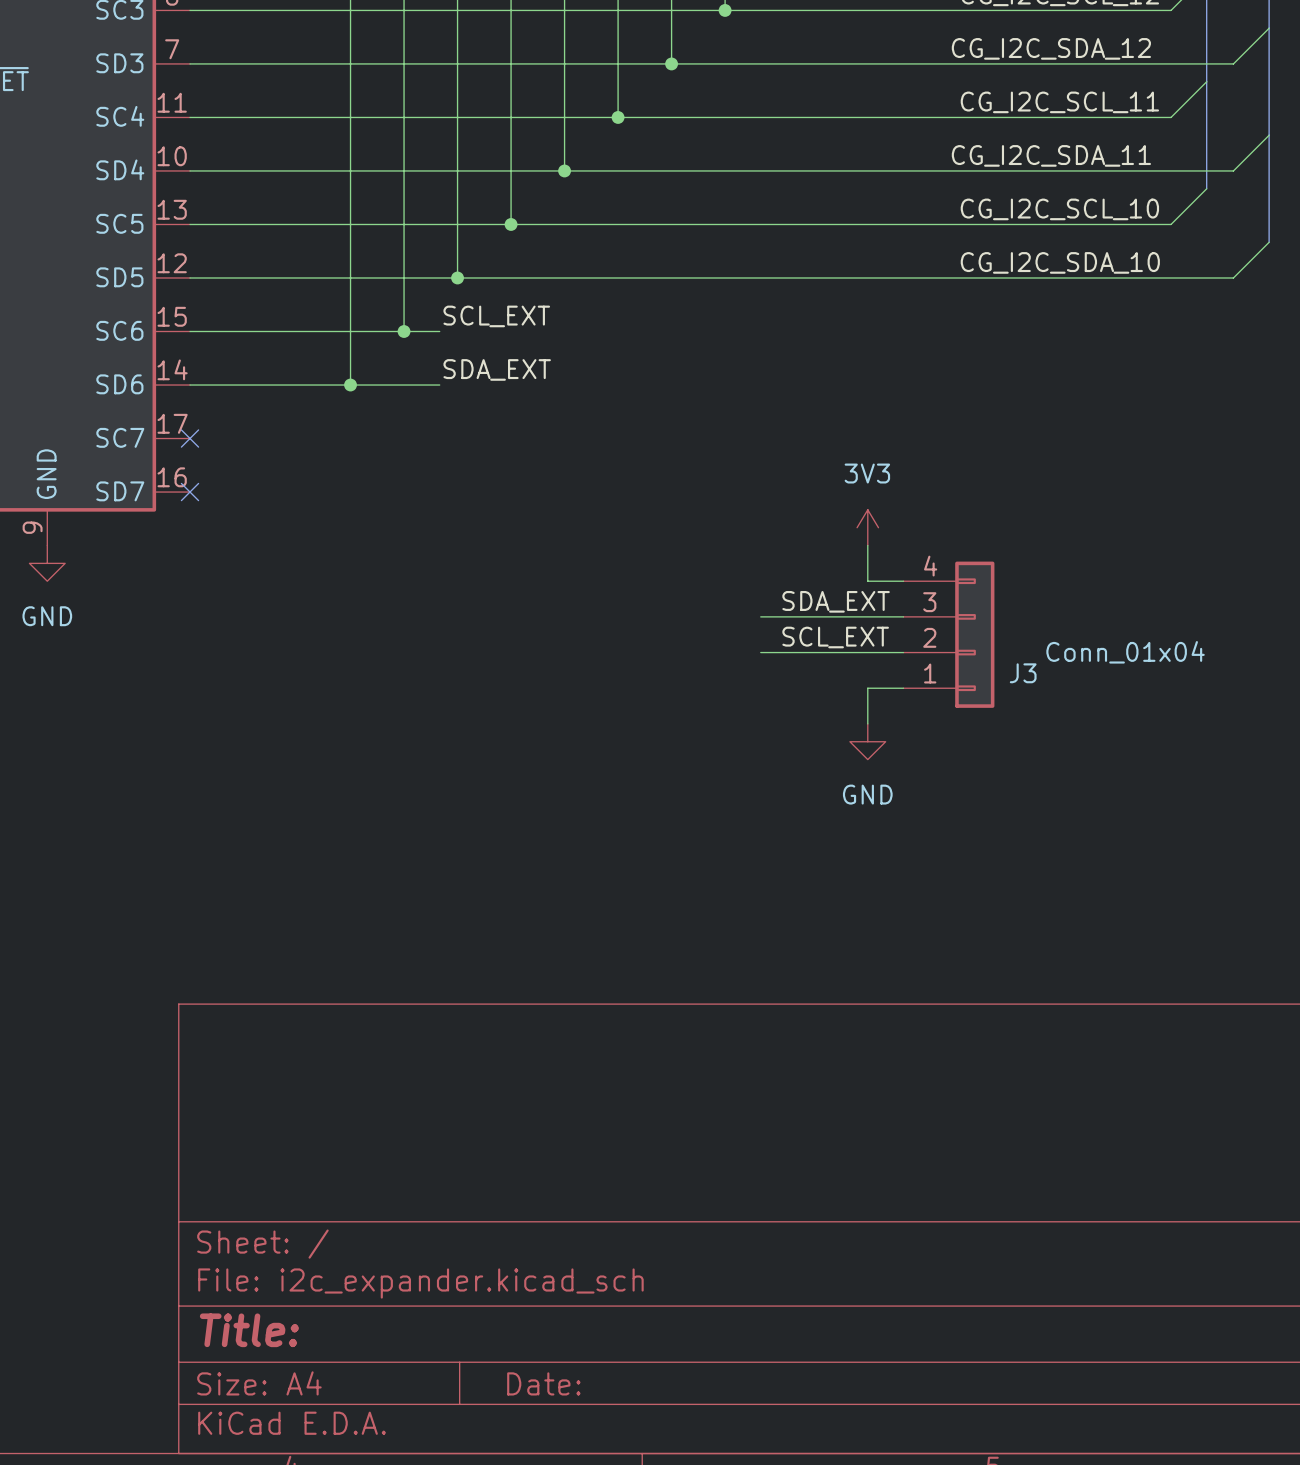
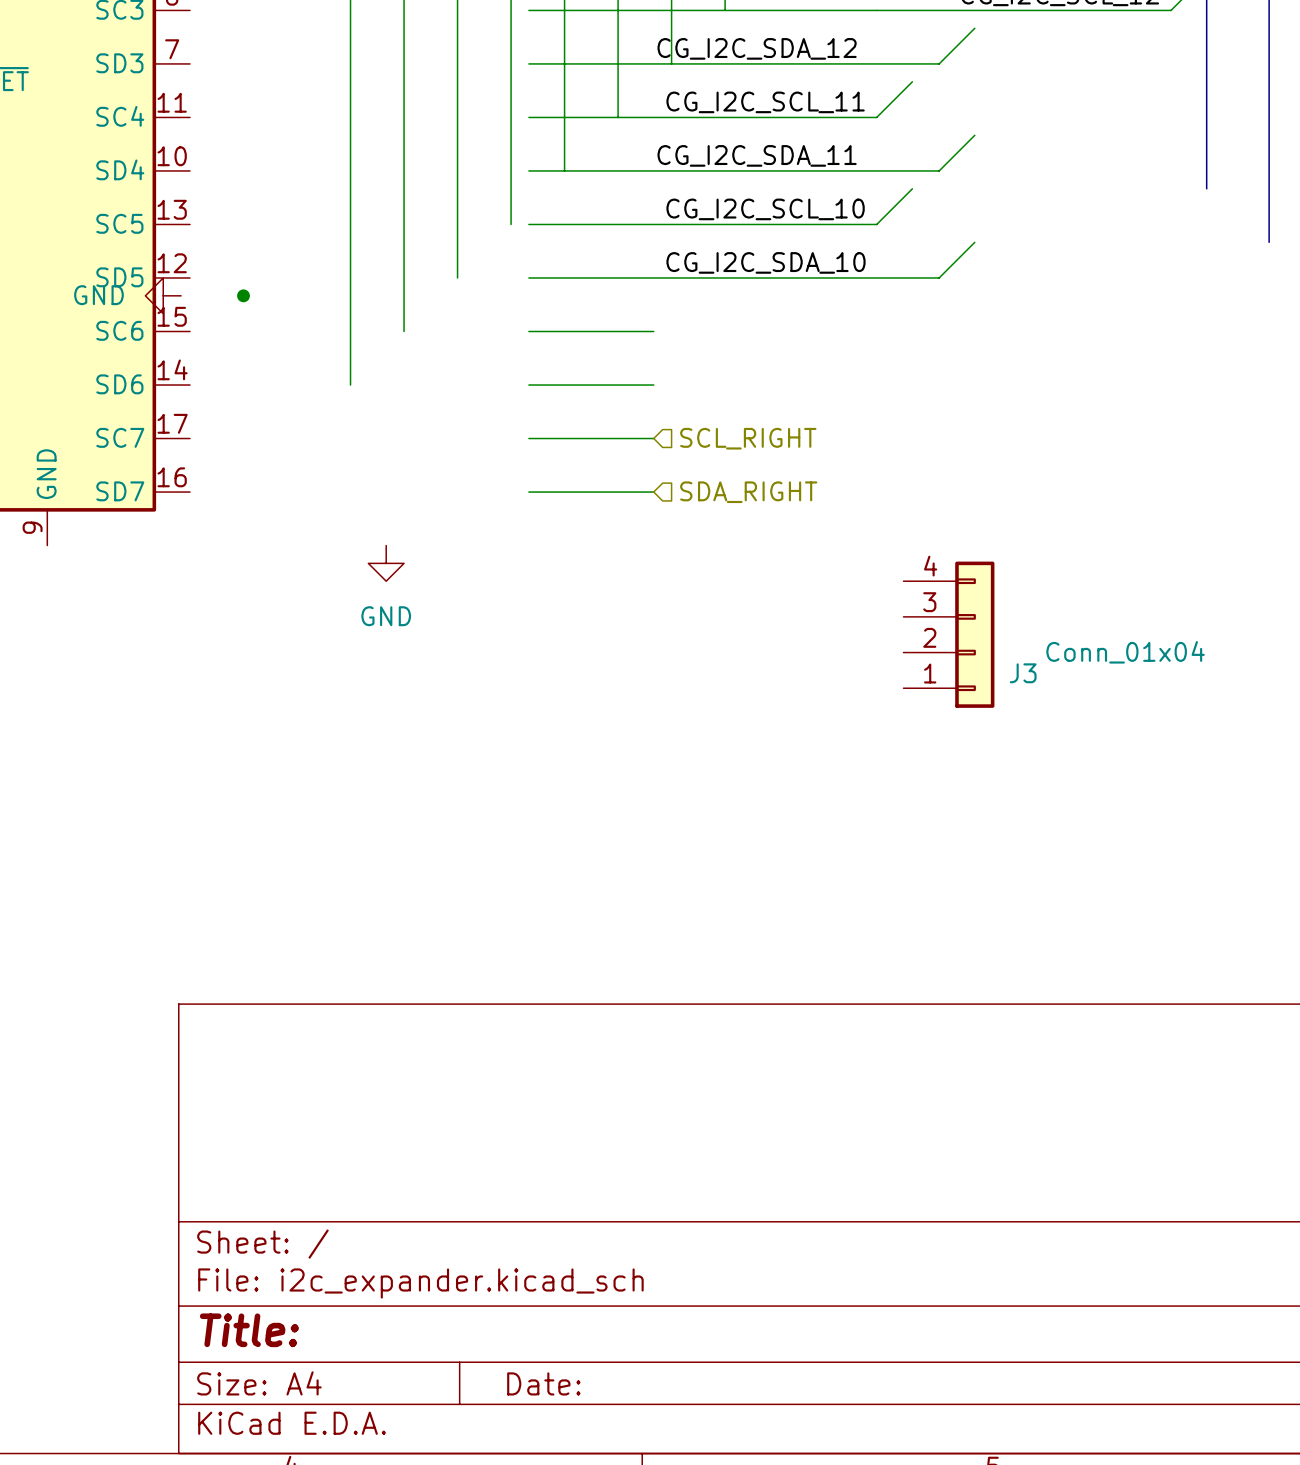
wire: (190, 10) (528, 10) -> none
junction: (725, 10) -> none
wire: (1269, 28) (1233, 63) (939, 63) -> (974, 28) (939, 63)
label position: CG_I2C_SDA_12 (1051, 48) -> CG_I2C_SDA_12 (757, 48)
wire: (190, 63) (528, 63) -> none
junction: (671, 63) -> none
wire: (1206, 81) (1171, 117) (876, 117) -> (912, 81) (876, 117)
label position: CG_I2C_SCL_11 (1059, 102) -> CG_I2C_SCL_11 (765, 102)
wire: (190, 117) (528, 117) -> none
junction: (618, 117) -> none
wire: (1269, 135) (1233, 170) (939, 170) -> (974, 135) (939, 170)
label position: CG_I2C_SDA_11 (1051, 155) -> CG_I2C_SDA_11 (757, 155)
wire: (190, 170) (528, 170) -> none
junction: (564, 170) -> none
wire: (1206, 188) (1171, 224) (876, 224) -> (912, 188) (876, 224)
label position: CG_I2C_SCL_10 (1059, 209) -> CG_I2C_SCL_10 (765, 209)
wire: (190, 224) (528, 224) -> none
junction: (511, 224) -> none
wire: (1269, 242) (1233, 277) (939, 277) -> (974, 242) (939, 277)
label position: CG_I2C_SDA_10 (1060, 262) -> CG_I2C_SDA_10 (766, 262)
wire: (190, 277) (528, 277) -> none
junction: (457, 277) -> none
power symbol: none -> GND (163, 295)
junction: none -> (243, 295)
label: SCL_EXT (496, 316) -> none
wire: (190, 331) (439, 331) -> none
junction: (404, 331) -> none
wire: none -> (528, 331) (653, 331)
label: SDA_EXT (497, 369) -> none
wire: (190, 385) (439, 385) -> none
junction: (350, 385) -> none
wire: none -> (528, 385) (653, 385)
no-connect mark: (190, 438) -> none
wire: none -> (528, 438) (653, 438)
hierarchical label: none -> SCL_RIGHT (748, 438)
no-connect mark: (190, 492) -> none
wire: none -> (528, 492) (653, 492)
hierarchical label: none -> SDA_RIGHT (748, 492)
power symbol: 3V3 (867, 527) -> none
wire: (867, 545) (867, 581) (903, 581) -> none
power symbol: GND (47, 563) -> none
power symbol: none -> GND (386, 563)
label: SDA_EXT (836, 601) -> none
wire: (760, 616) (903, 616) -> none
label: SCL_EXT (835, 637) -> none
wire: (760, 652) (903, 652) -> none
wire: (903, 688) (867, 688) (867, 723) -> none
power symbol: GND (867, 741) -> none

